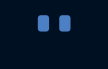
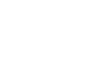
part: (54, 23) -> none

